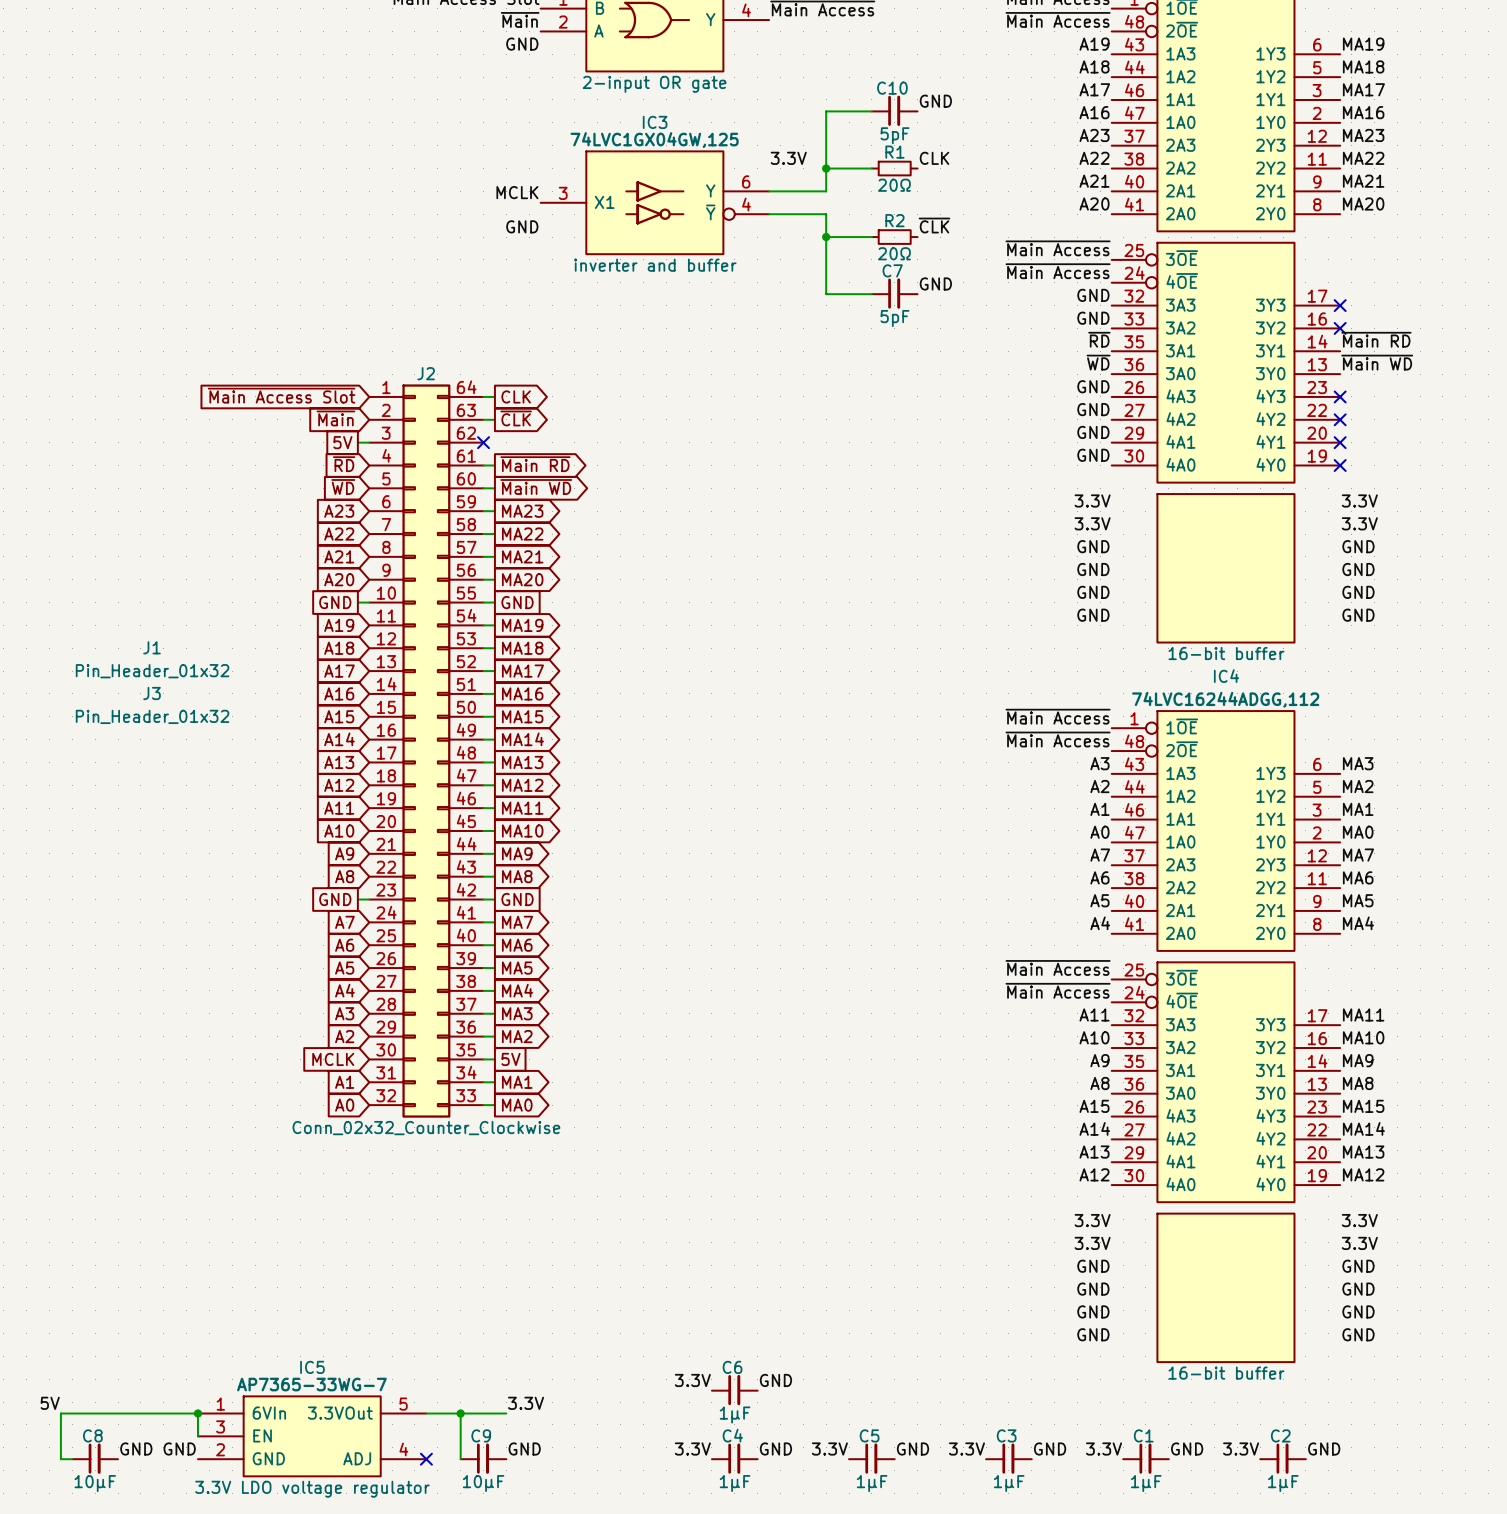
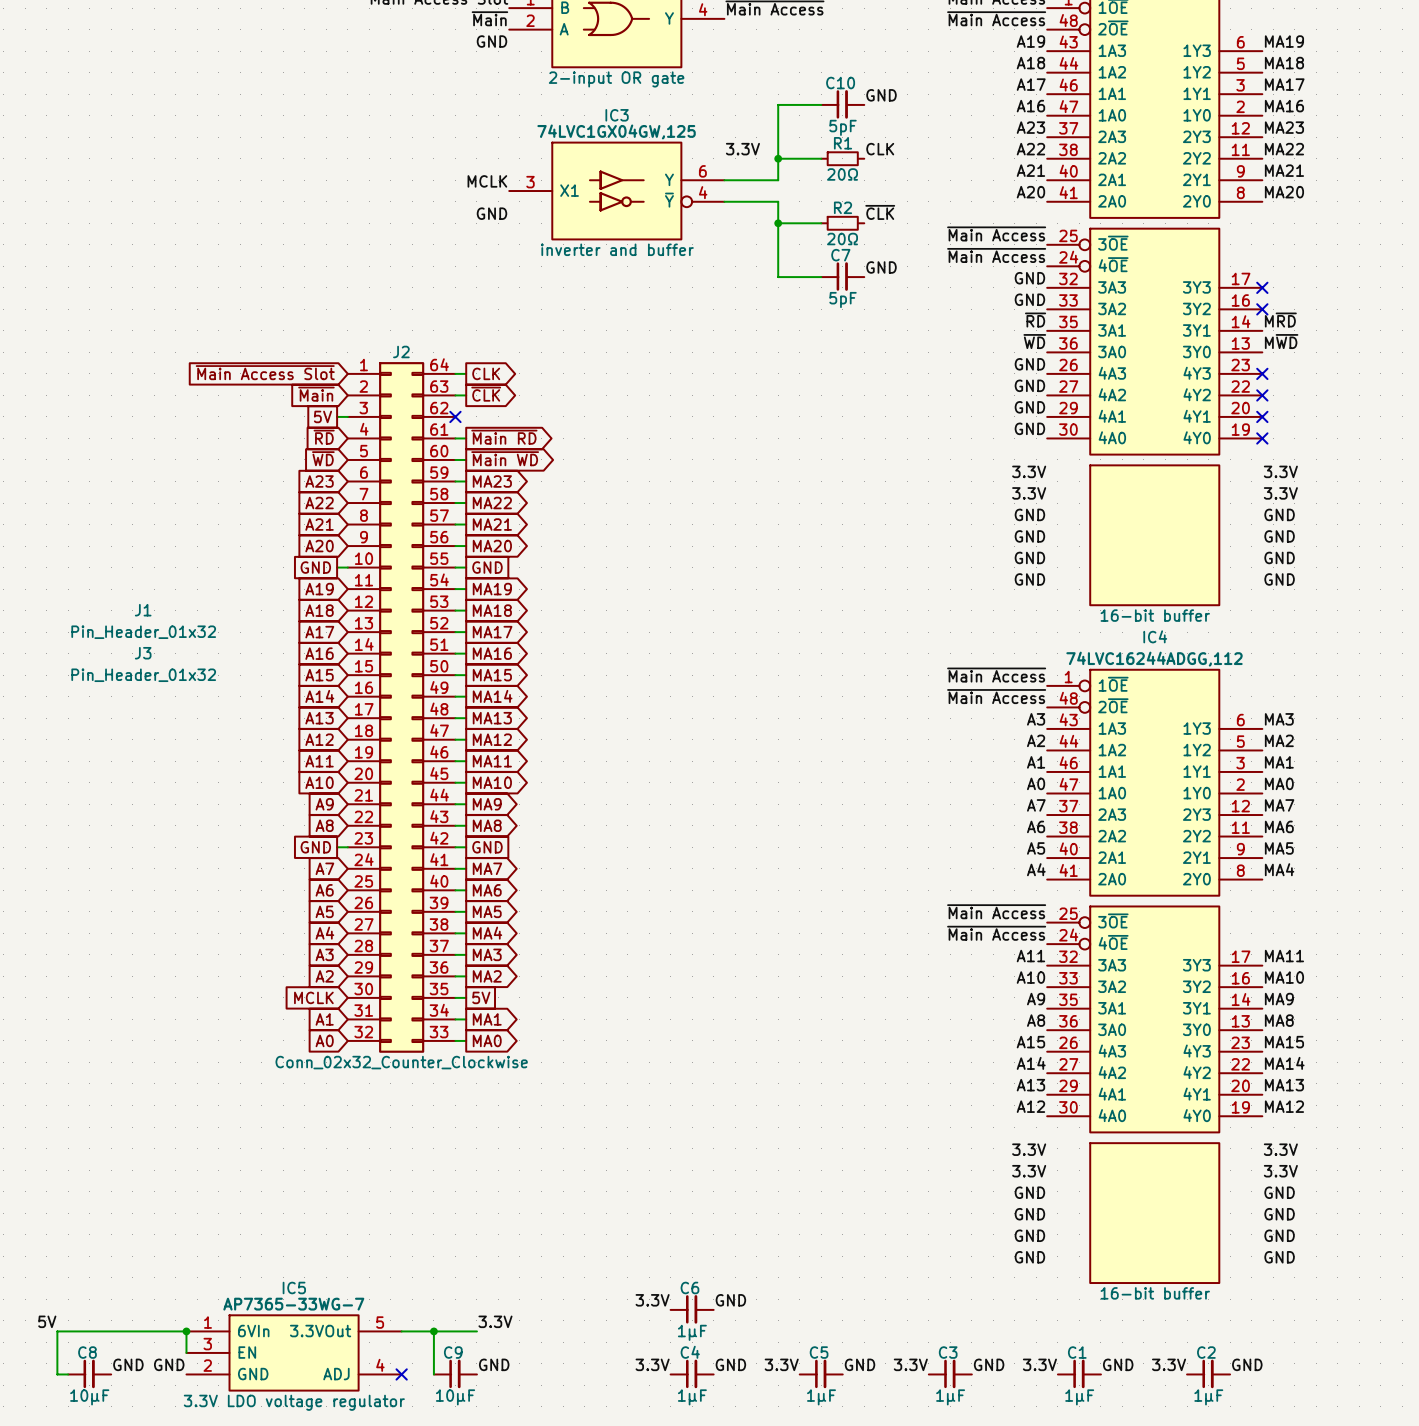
label: ~{Main RD} (1376, 339) -> M~{RD} (1280, 320)
label: ~{Main WD} (1377, 362) -> M~{WD} (1281, 341)

